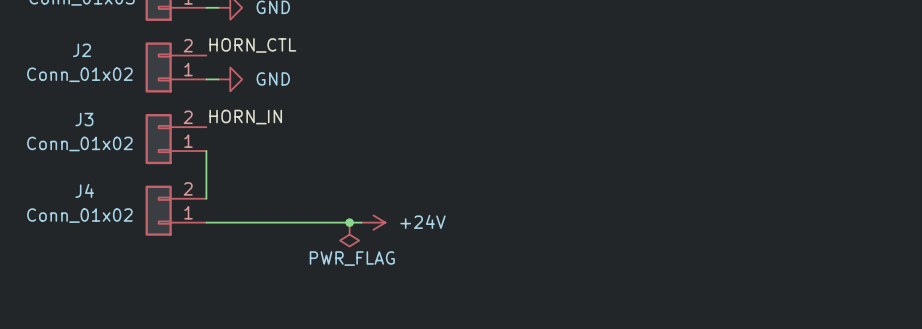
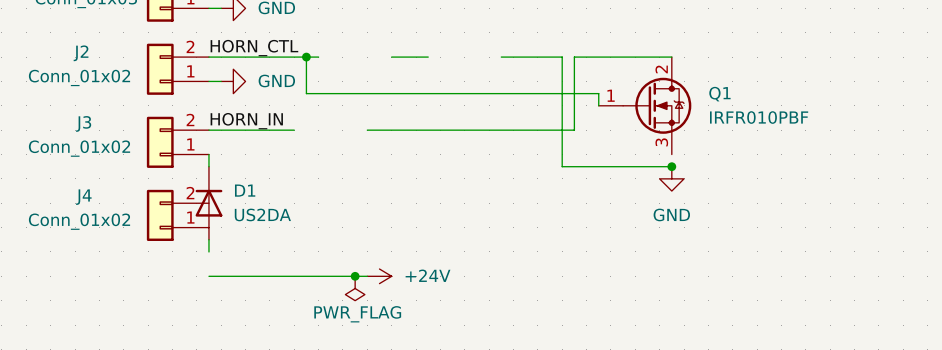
wire: none -> (208, 57) (318, 57)
wire: none -> (306, 57) (306, 93) (598, 93) (598, 105)
junction: none -> (306, 57)
wire: none -> (391, 57) (428, 57)
wire: none -> (501, 57) (562, 57) (562, 166) (671, 166)
wire: none -> (671, 57) (574, 57) (574, 130) (367, 130)
Q1: none -> IRFR010PBF (645, 105)
wire: none -> (208, 130) (294, 130)
junction: none -> (671, 166)
power symbol: none -> GND (671, 178)
D1: none -> US2DA (208, 203)
wire: (206, 222) (361, 222) -> (208, 276) (367, 276)
junction position: (349, 222) -> (355, 276)
power symbol position: +24V (373, 222) -> +24V (379, 276)
wire: none -> (208, 239) (208, 251)
power symbol position: PWR_FLAG (349, 234) -> PWR_FLAG (355, 288)

